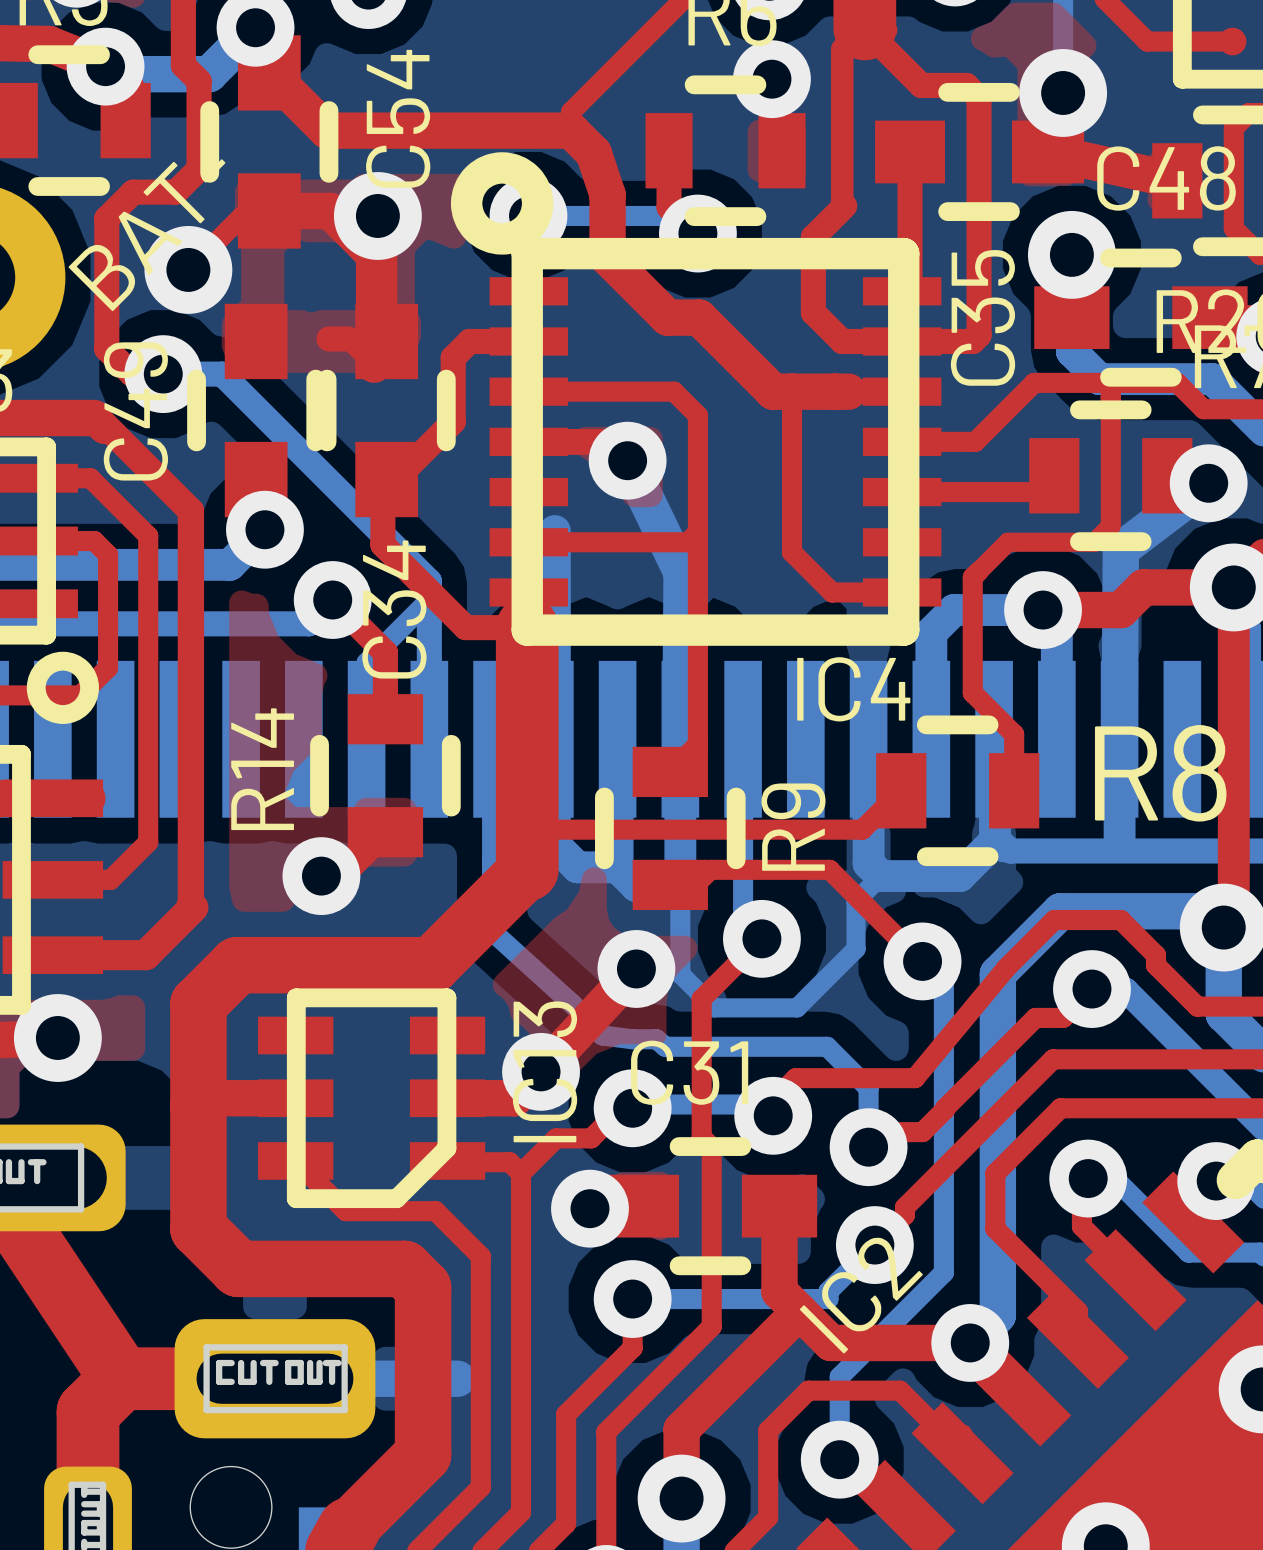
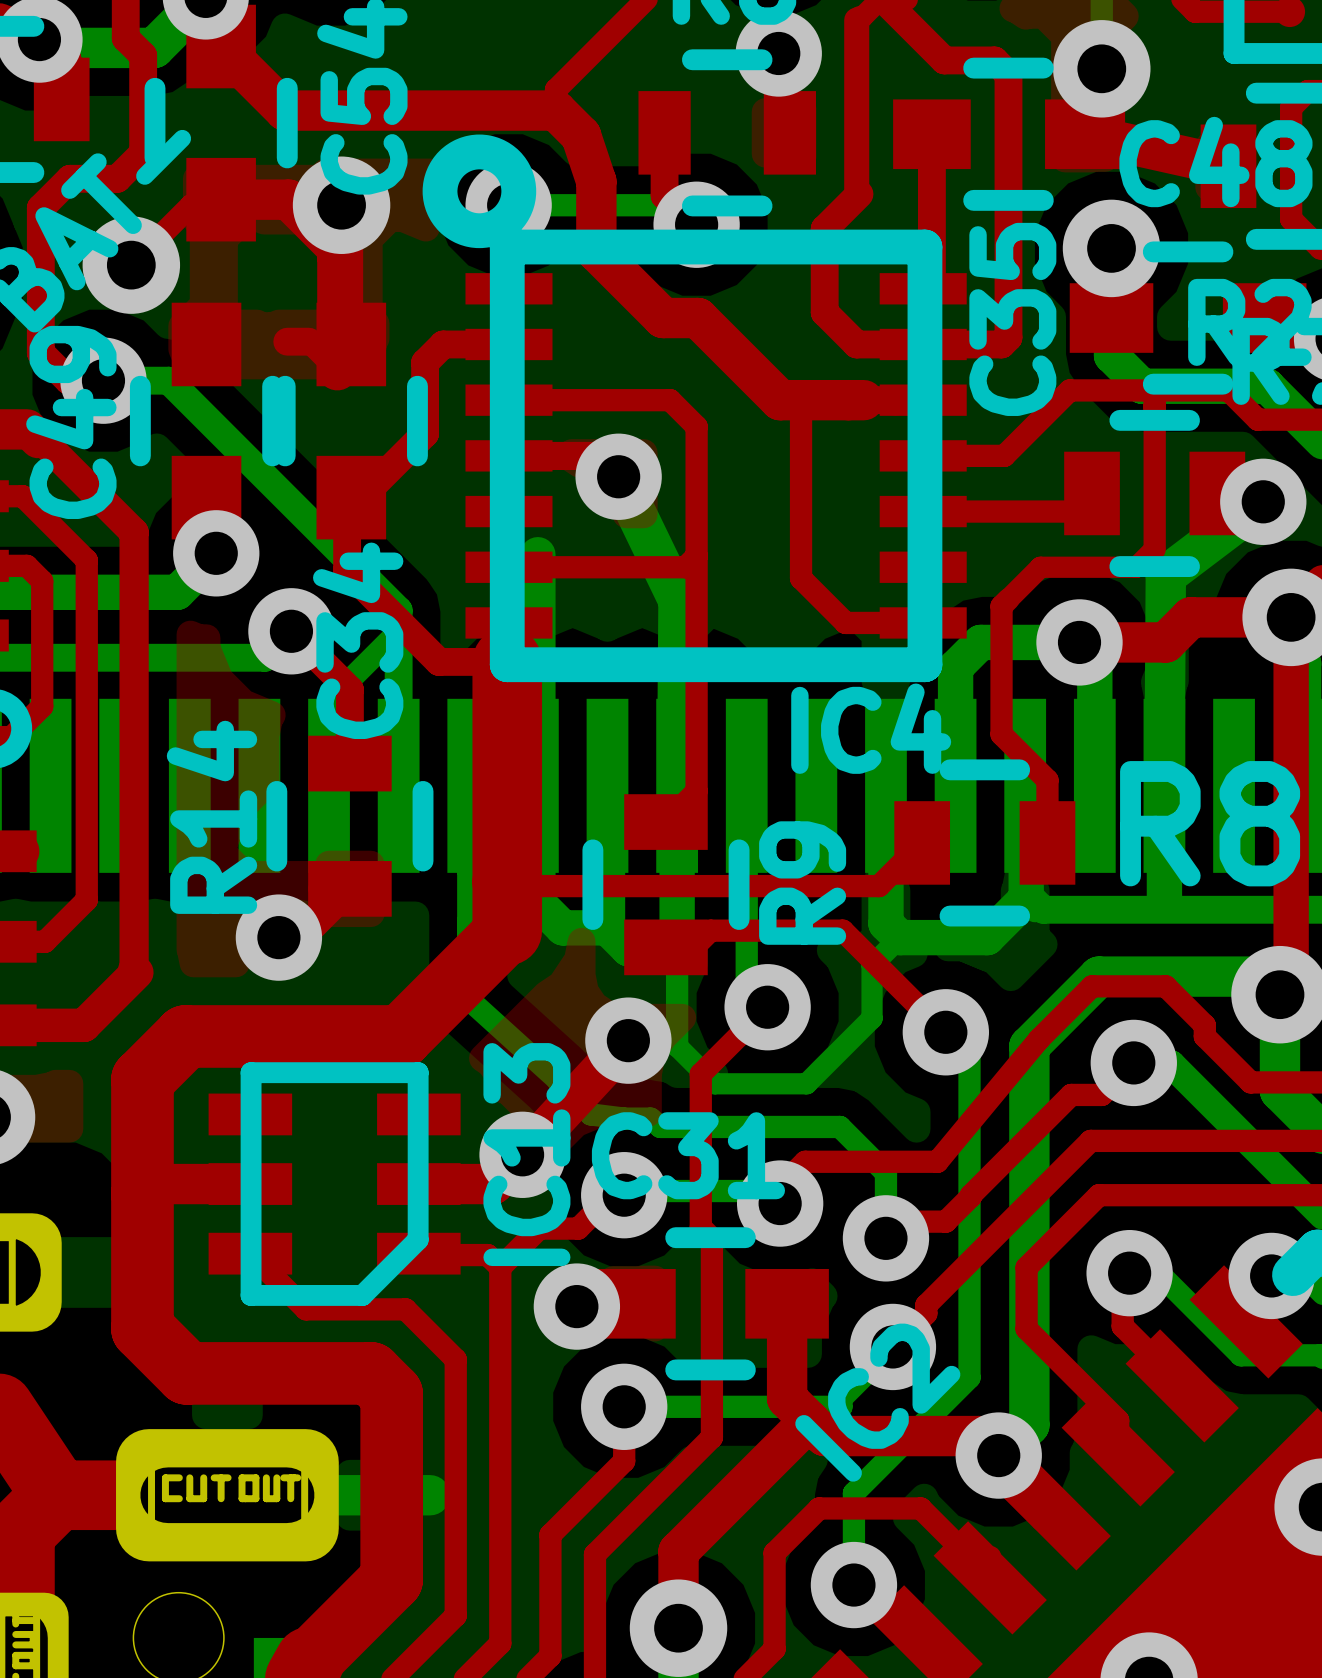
top track: (813, 1325) (830, 1342) (970, 1342) -> (824, 1436) (979, 1436) (998, 1455)

